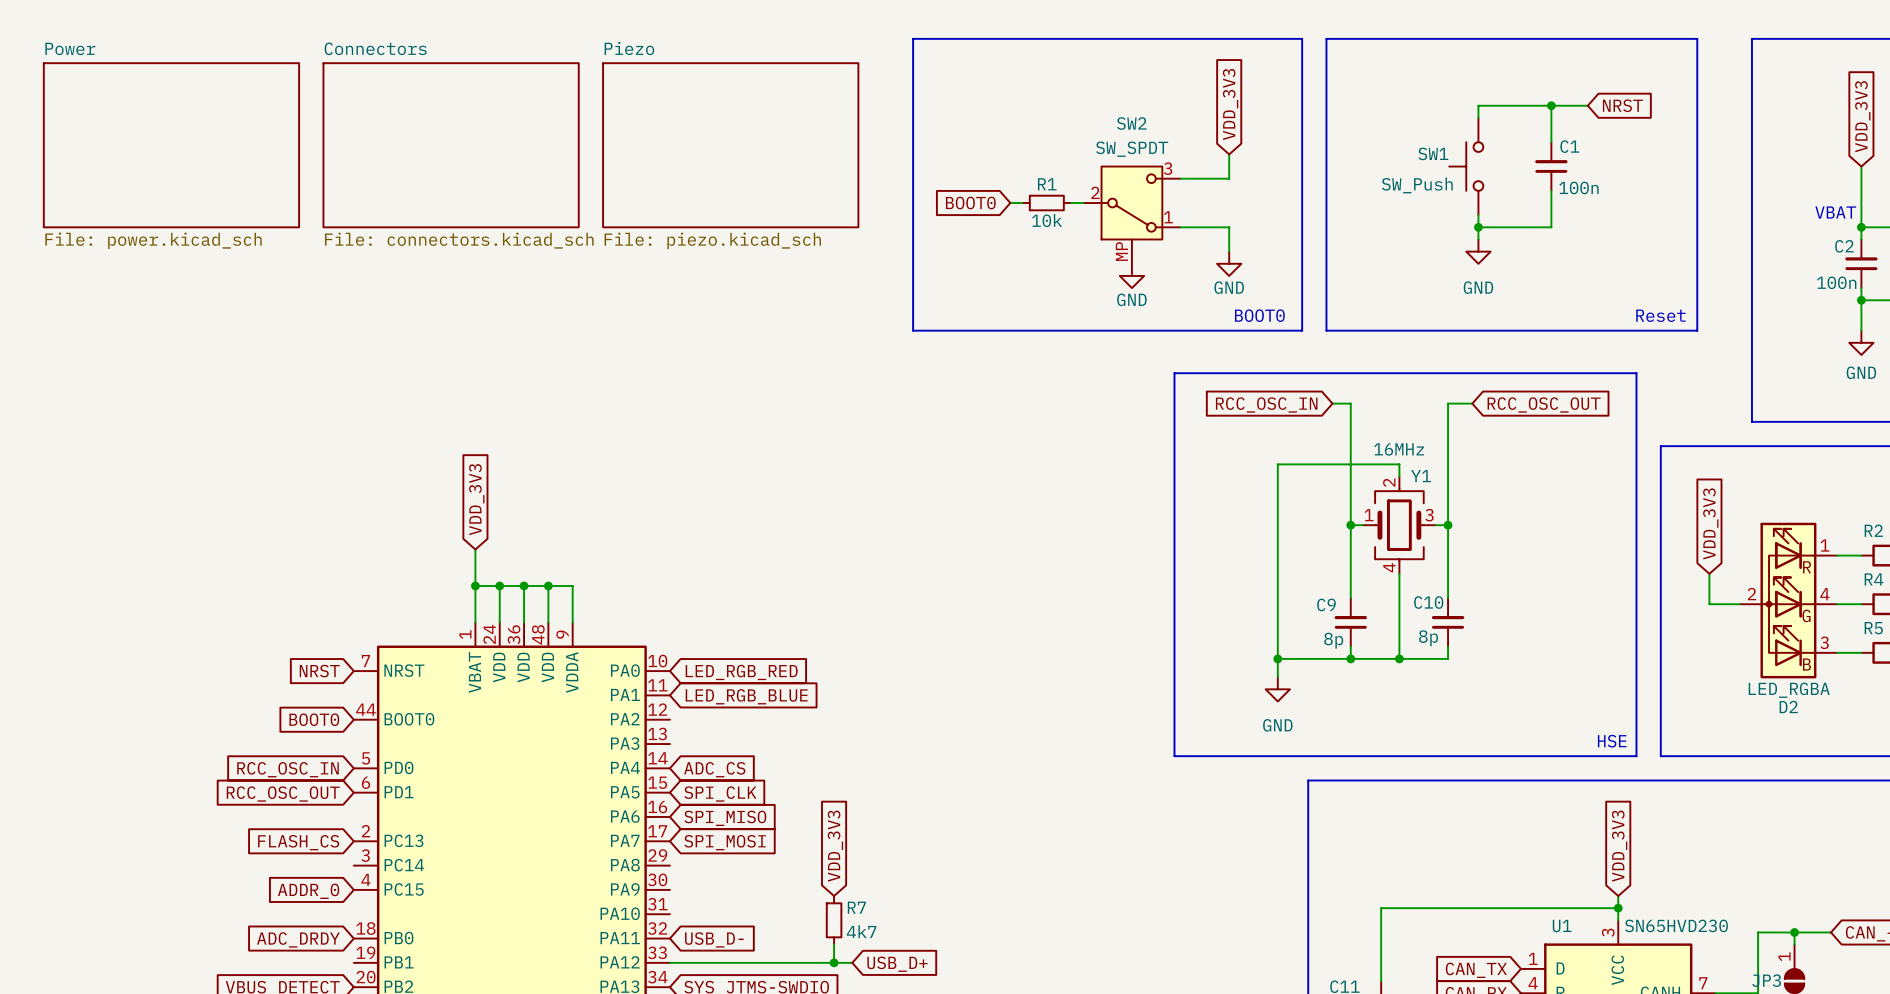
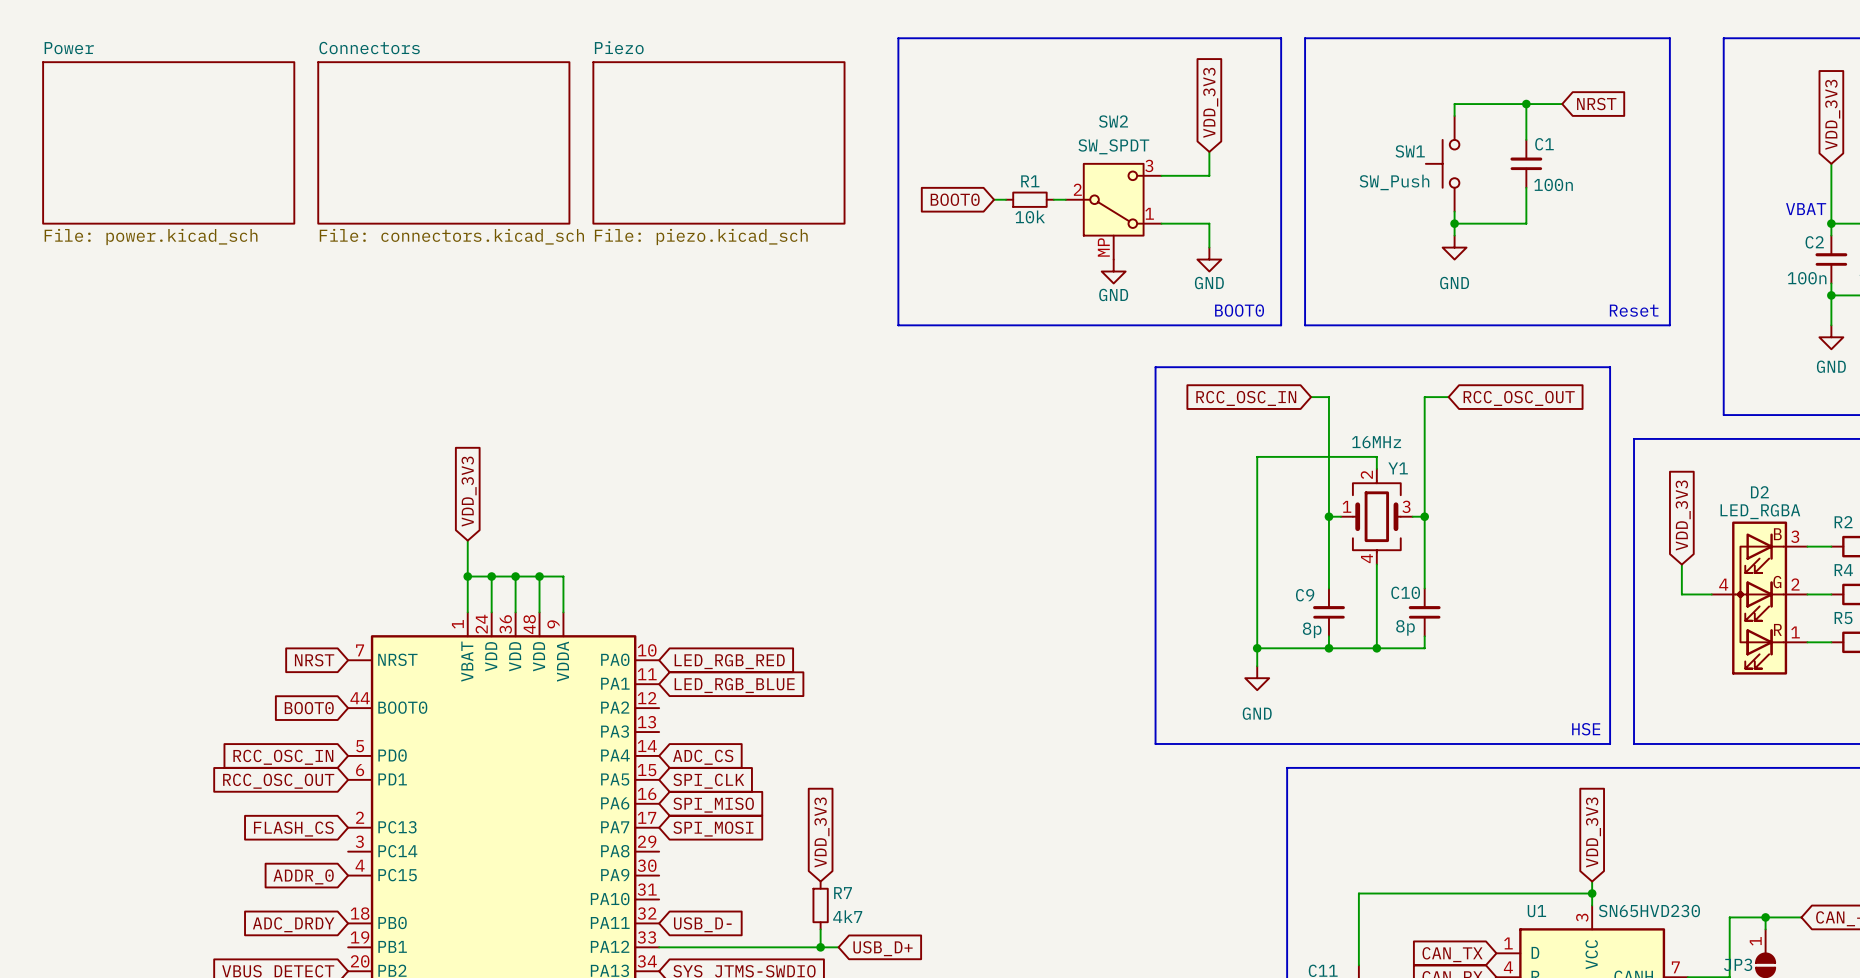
D2 symbol: [1739, 522, 1838, 679] -> [1711, 521, 1808, 675]
D2 value position: LED_RGBA (1789, 690) -> LED_RGBA (1760, 511)
D2 name position: D2 (1788, 706) -> D2 (1759, 492)

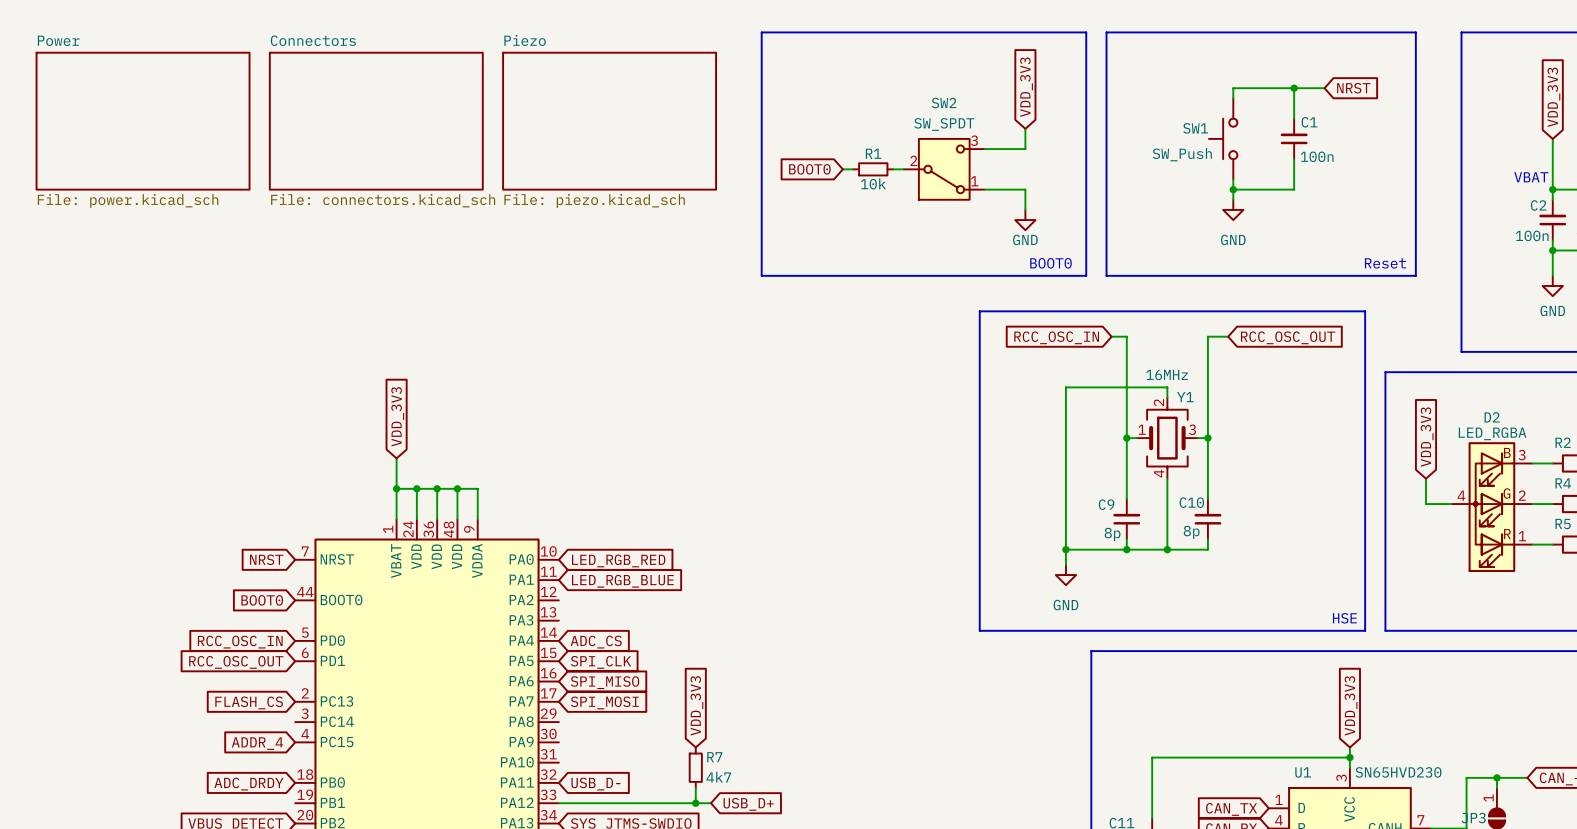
SW2 symbol: [1065, 163, 1162, 260] -> [903, 138, 985, 200]
power symbol: GND (1113, 271) -> none
global label: ADDR_0 (303, 876) -> ADDR_4 (257, 743)

